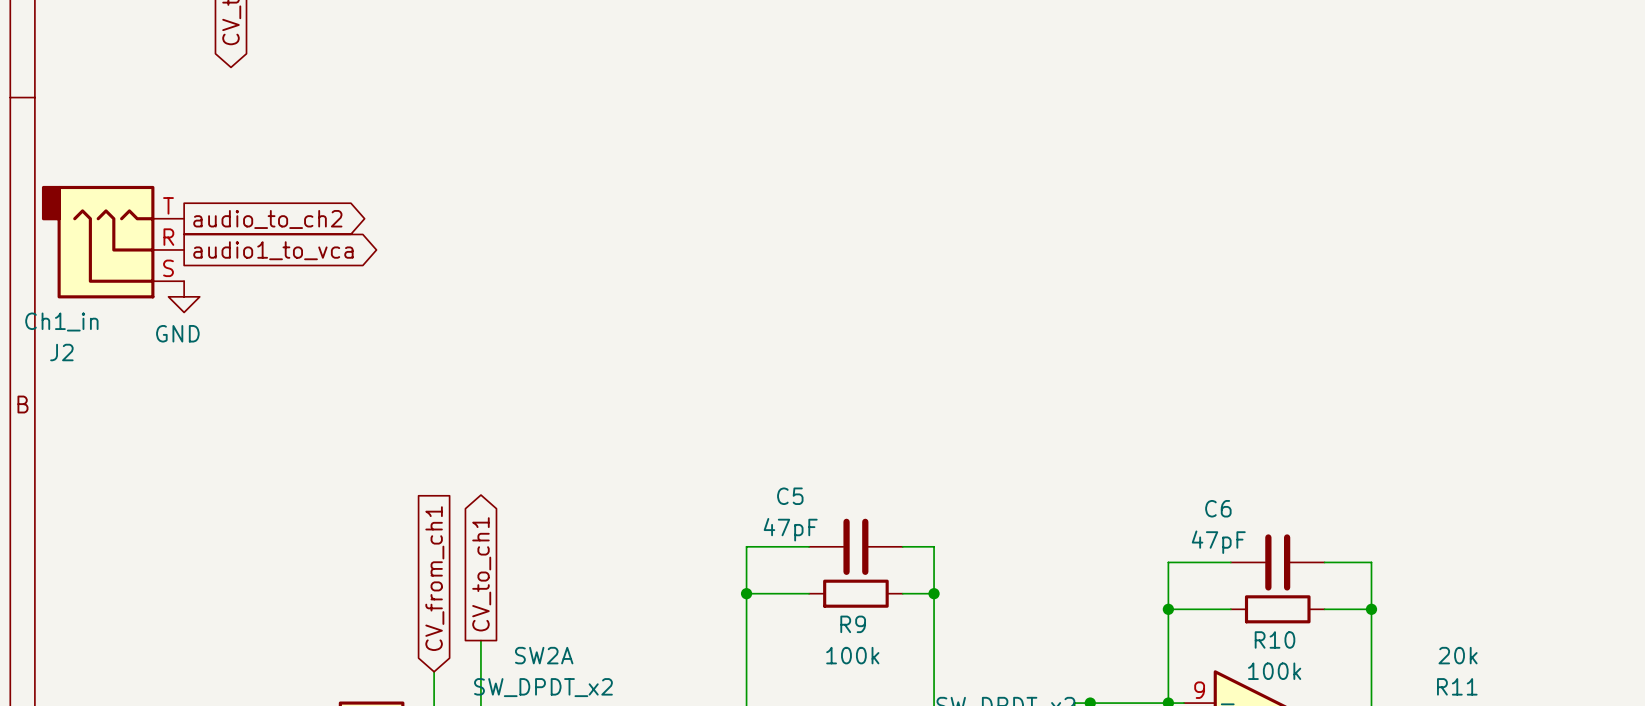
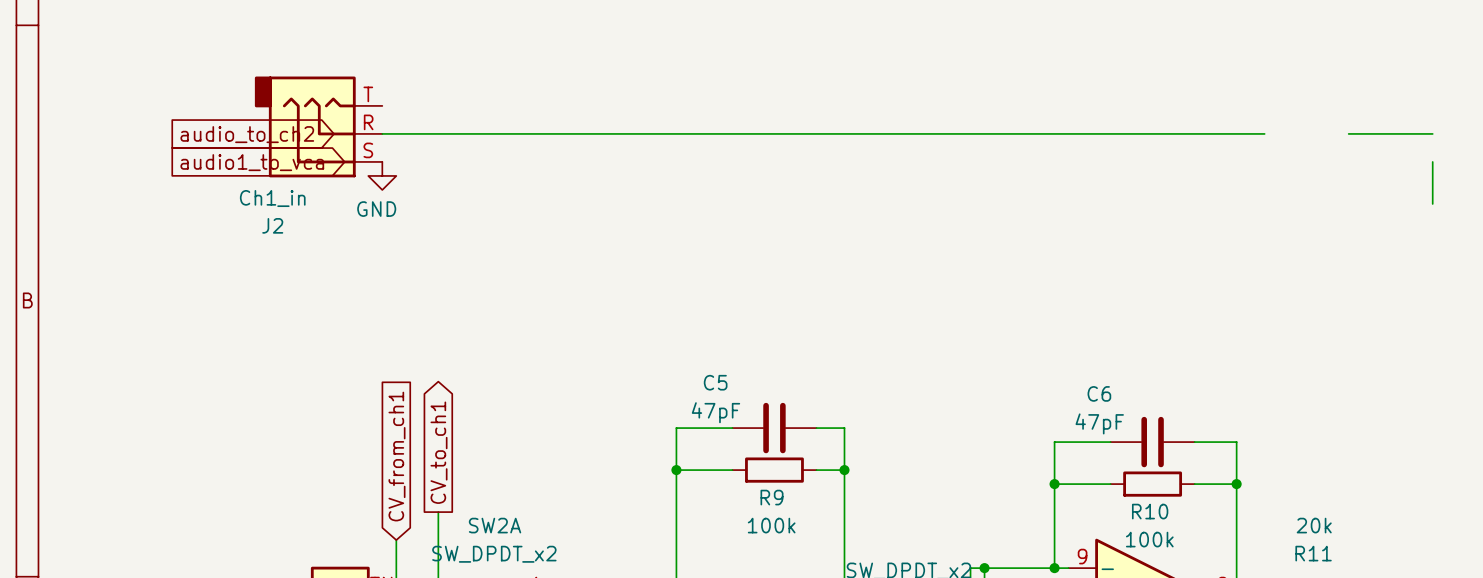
wire: none -> (382, 133) (1264, 133)
wire: none -> (1348, 133) (1432, 133)
J2 position: (113, 242) -> (318, 126)
wire: none -> (1432, 161) (1432, 203)
power symbol: none -> GND (382, 175)
power symbol: GND (184, 296) -> none

